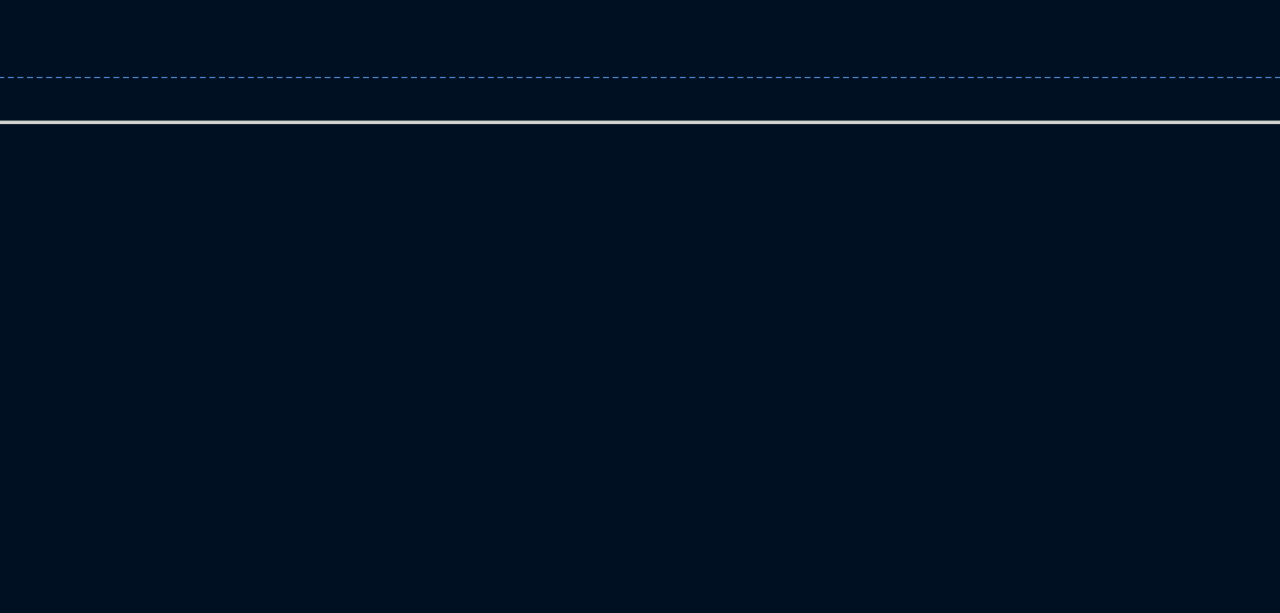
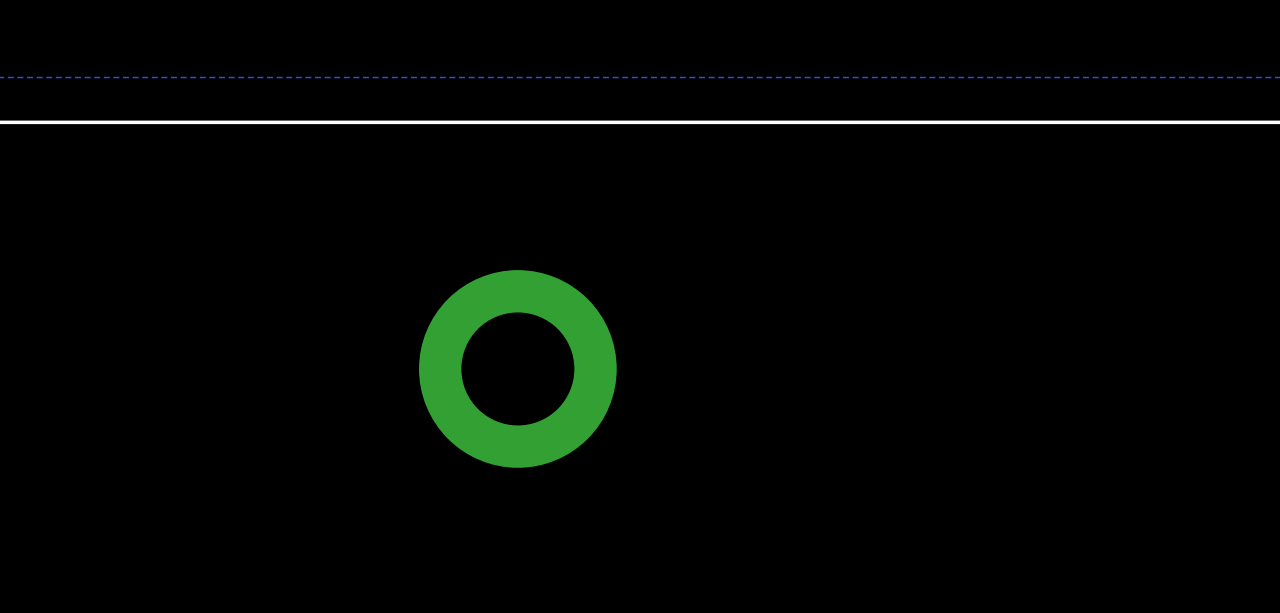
part: none -> (517, 368)

